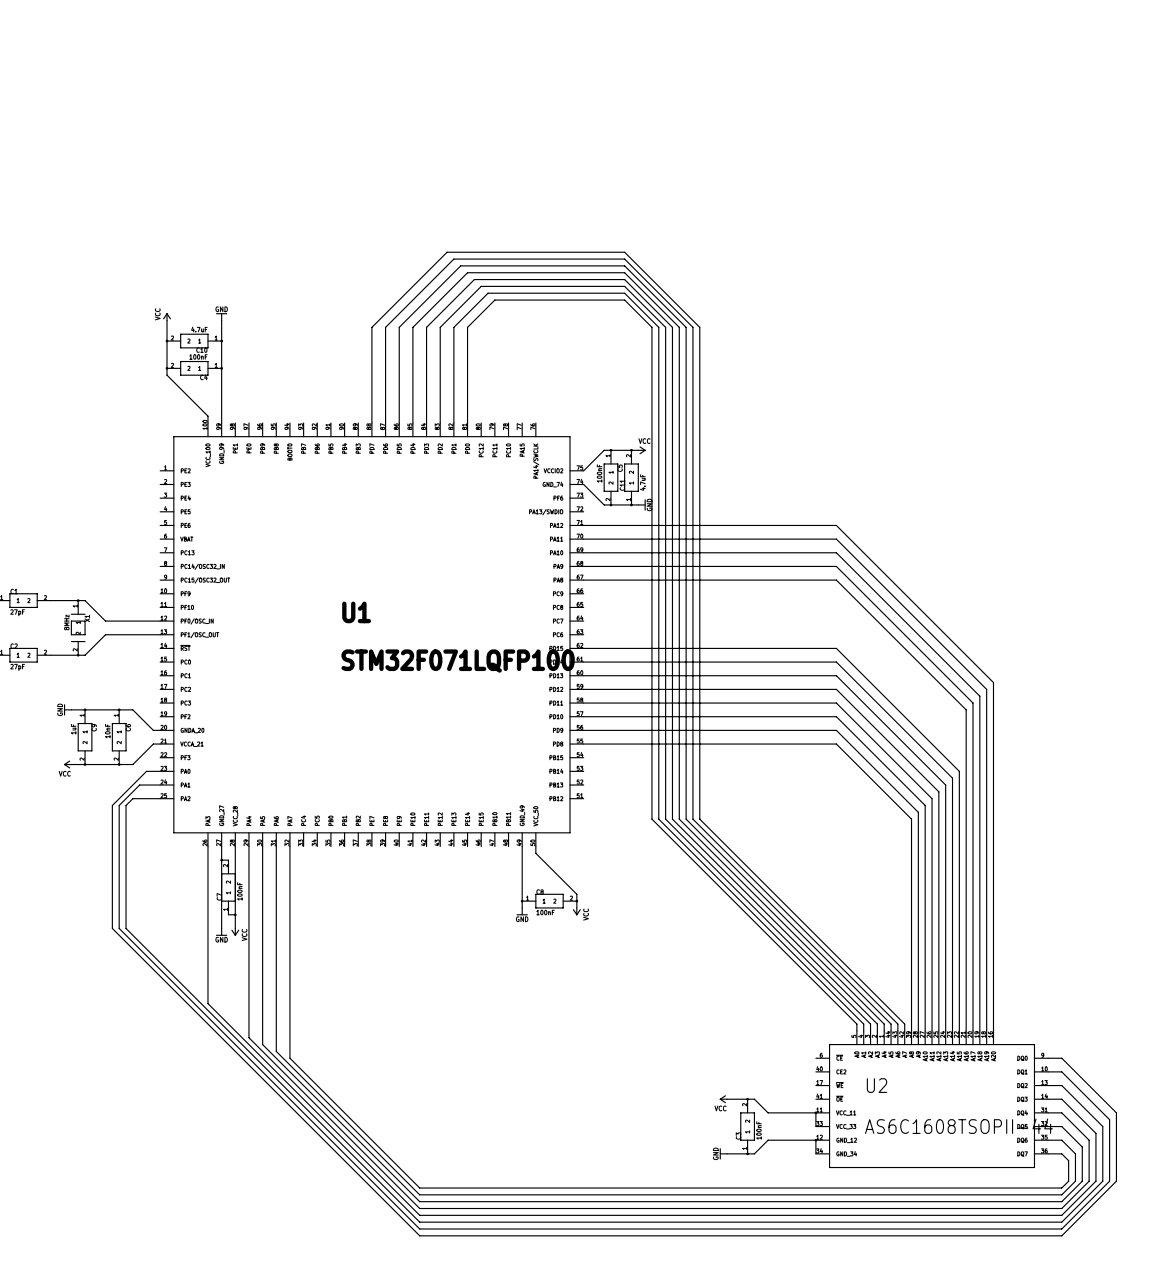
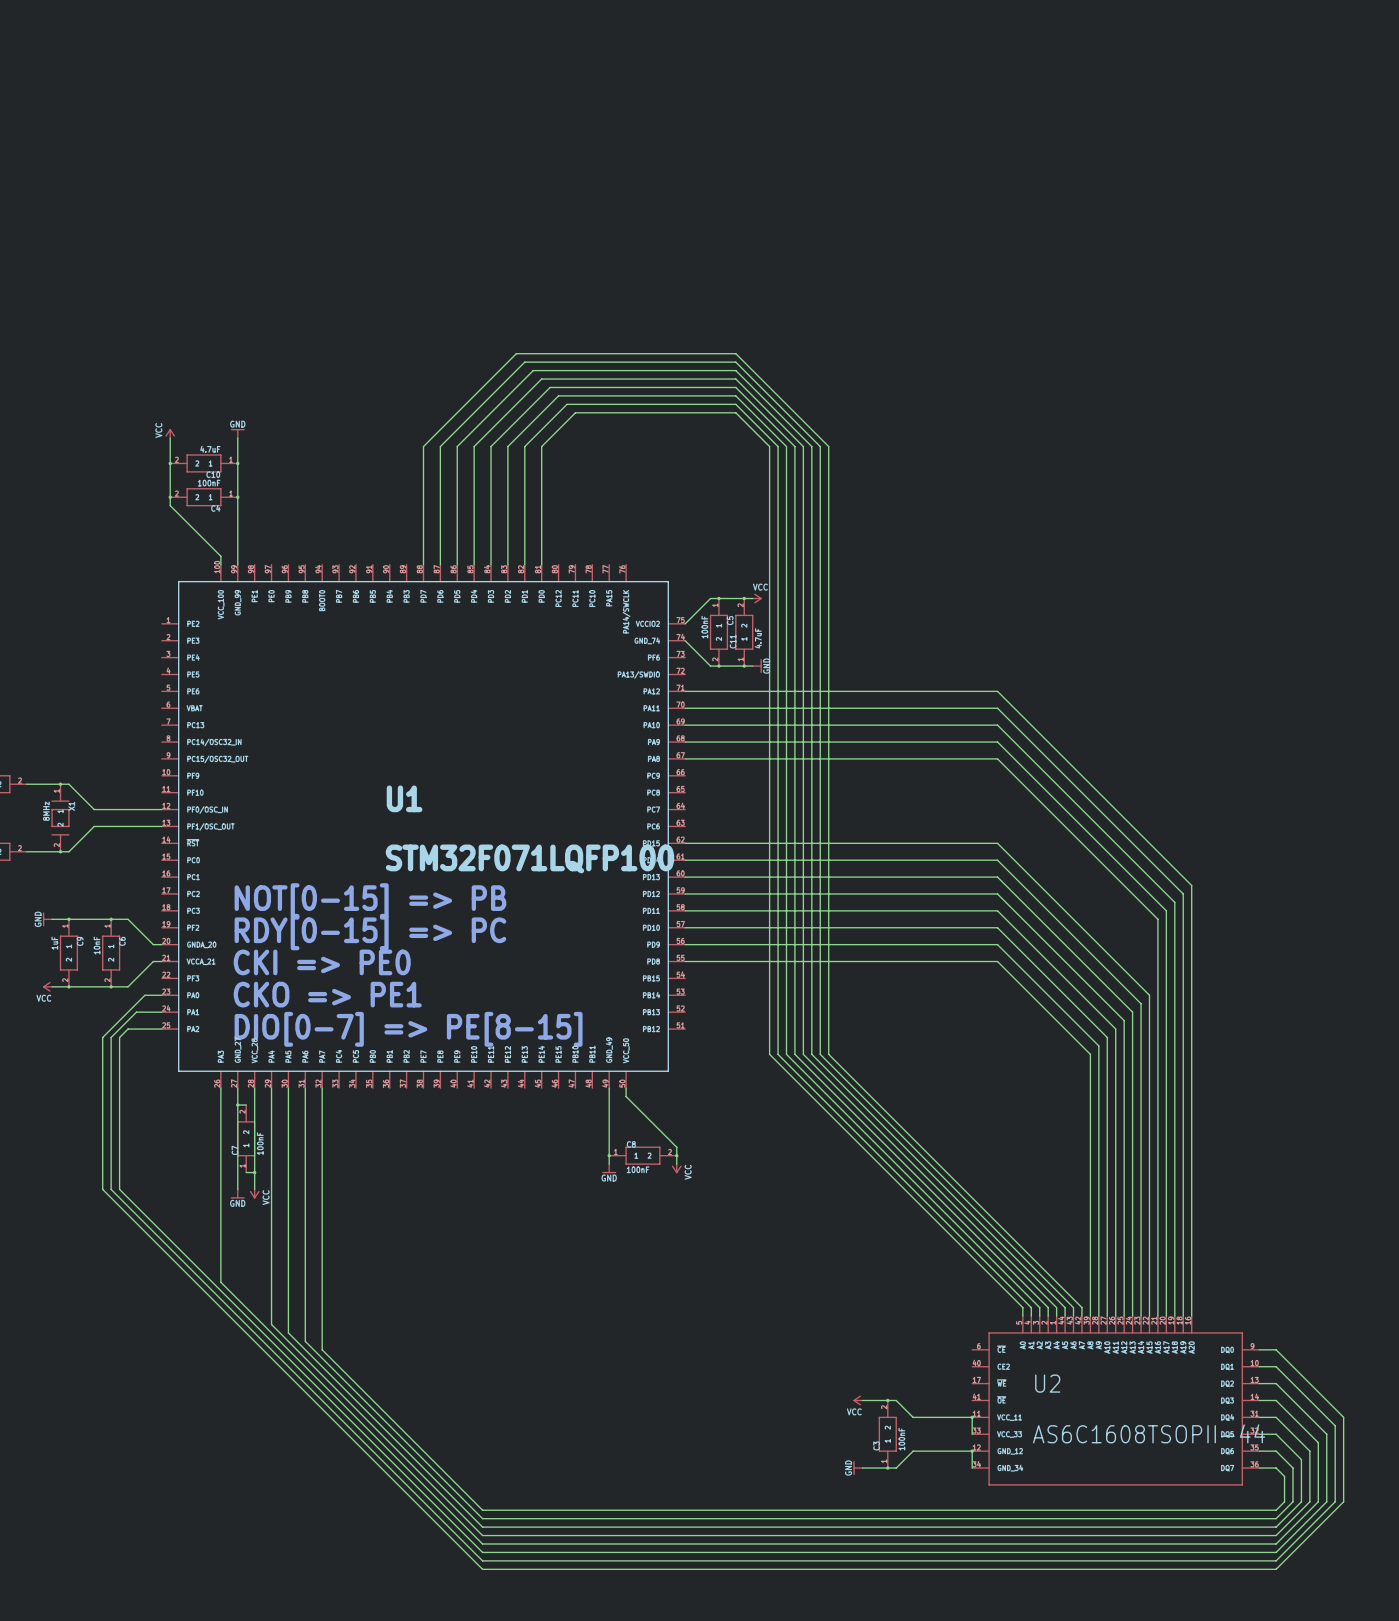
text: none -> NOT[0-15] => PB (370, 900)
text: none -> RDY[0-15] => PC (370, 932)
text: none -> CKI => PE0 (322, 962)
text: none -> CKO => PE1 (327, 994)
text: none -> DIO[0-7] => PE[8-15] (408, 1029)

